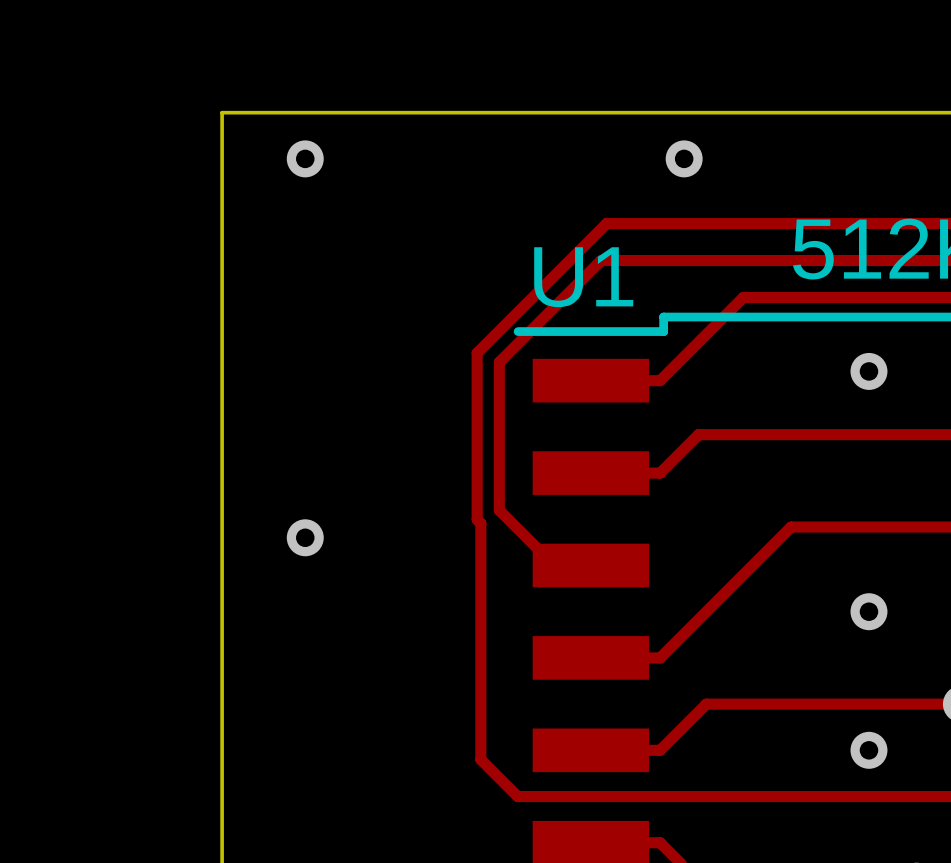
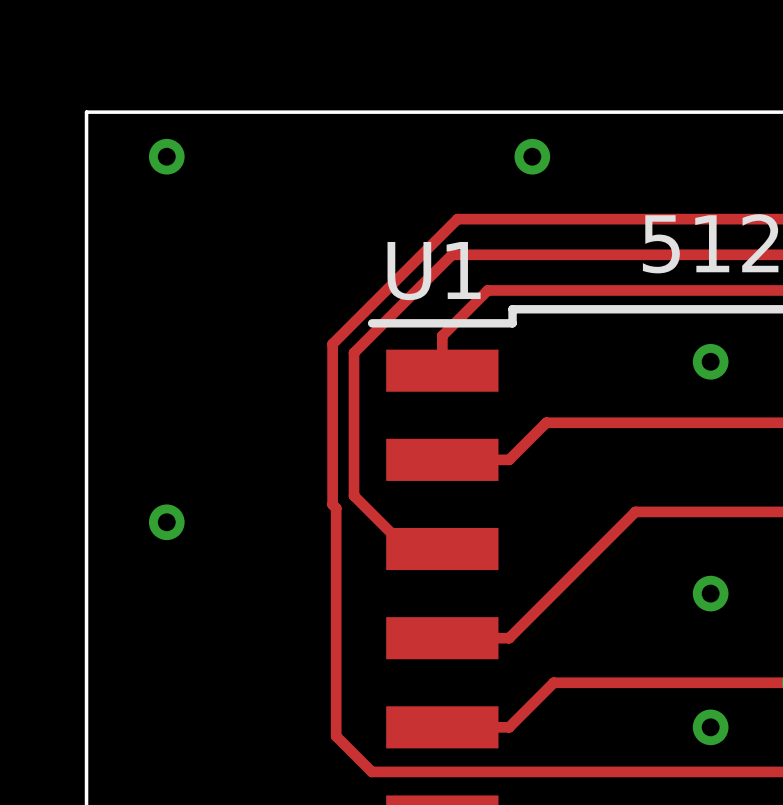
top track: (743, 297) (660, 380) (590, 380) -> (589, 290) (487, 290) (442, 335) (442, 370)

